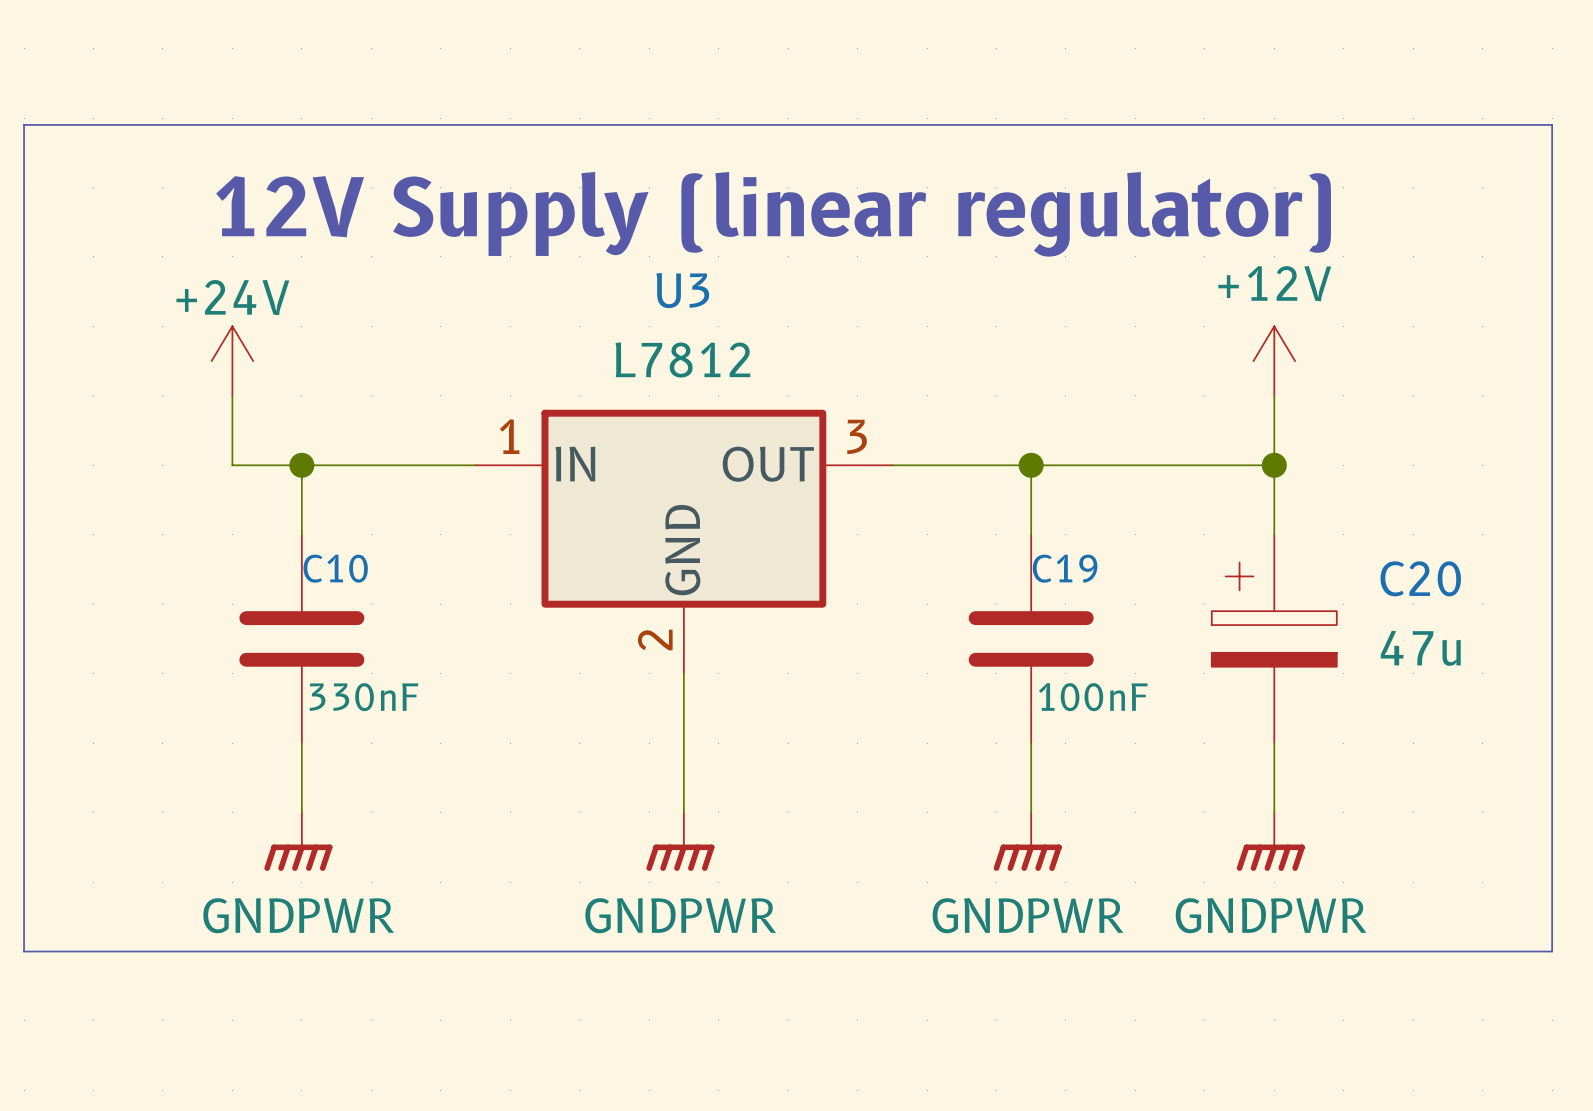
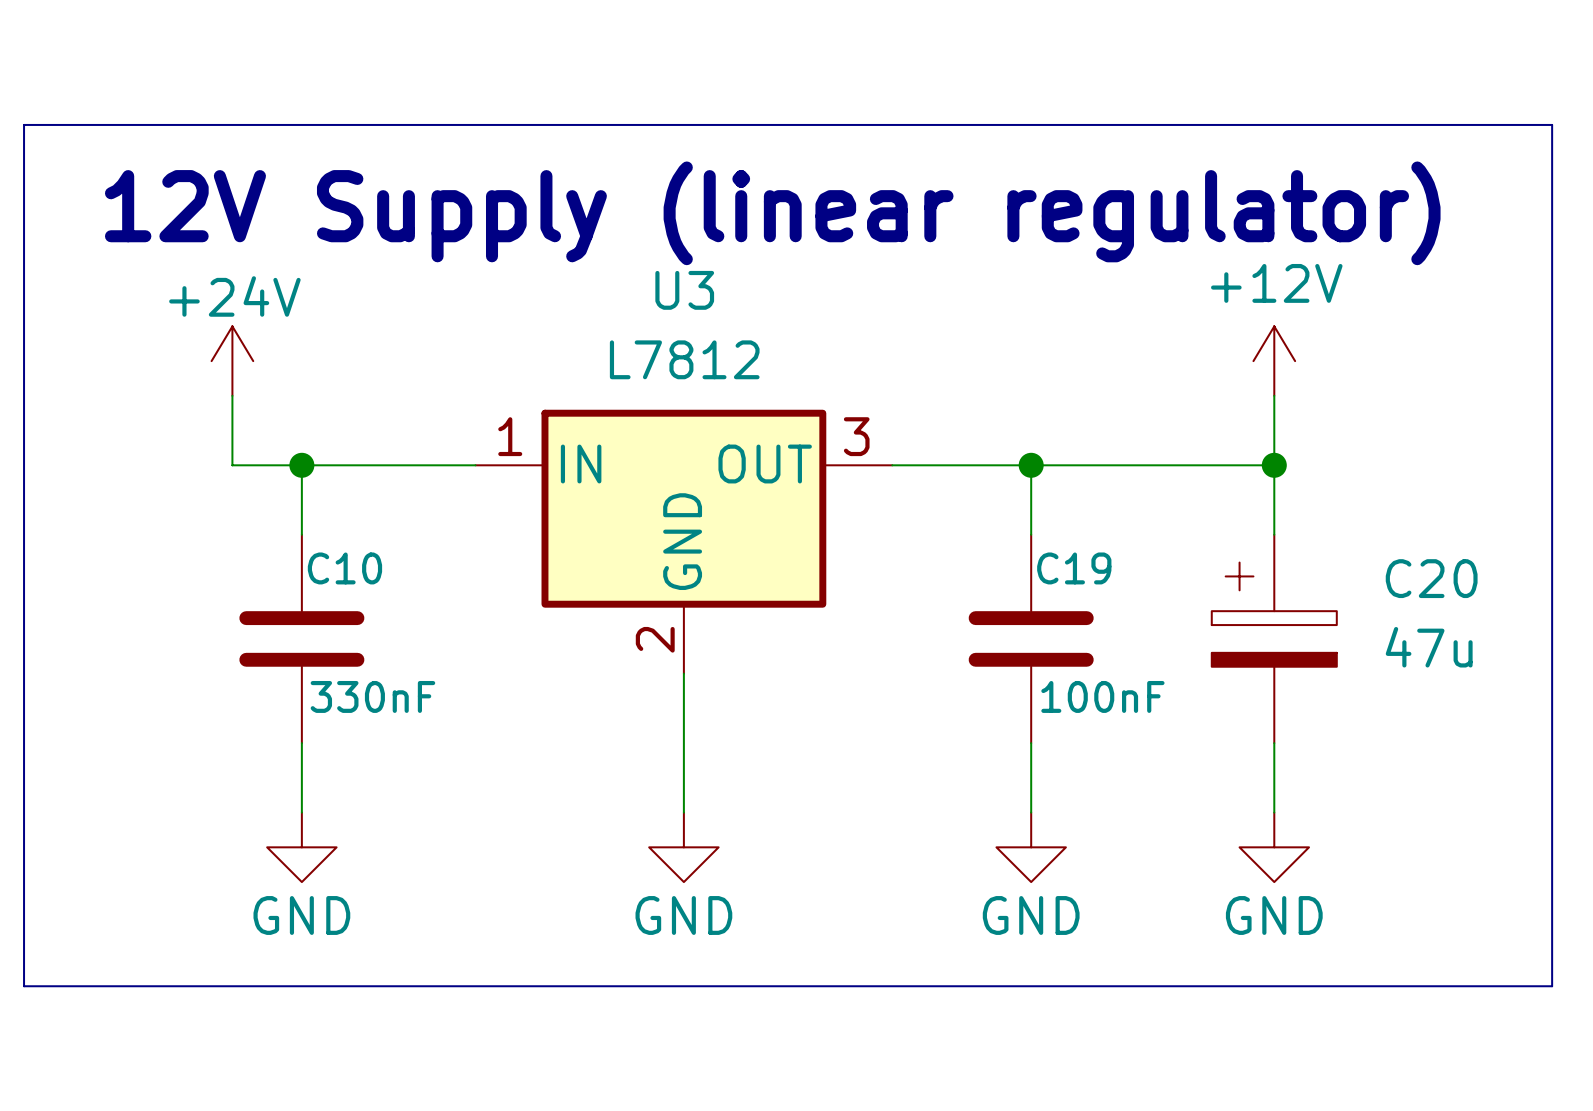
power symbol: GNDPWR (298, 841) -> GND (301, 847)
power symbol: GNDPWR (680, 841) -> GND (683, 847)
power symbol: GNDPWR (1027, 841) -> GND (1031, 847)
power symbol: GNDPWR (1270, 841) -> GND (1274, 847)
line: (24, 951) (1552, 951) -> (24, 951) (24, 986) (1552, 986) (1552, 951)

